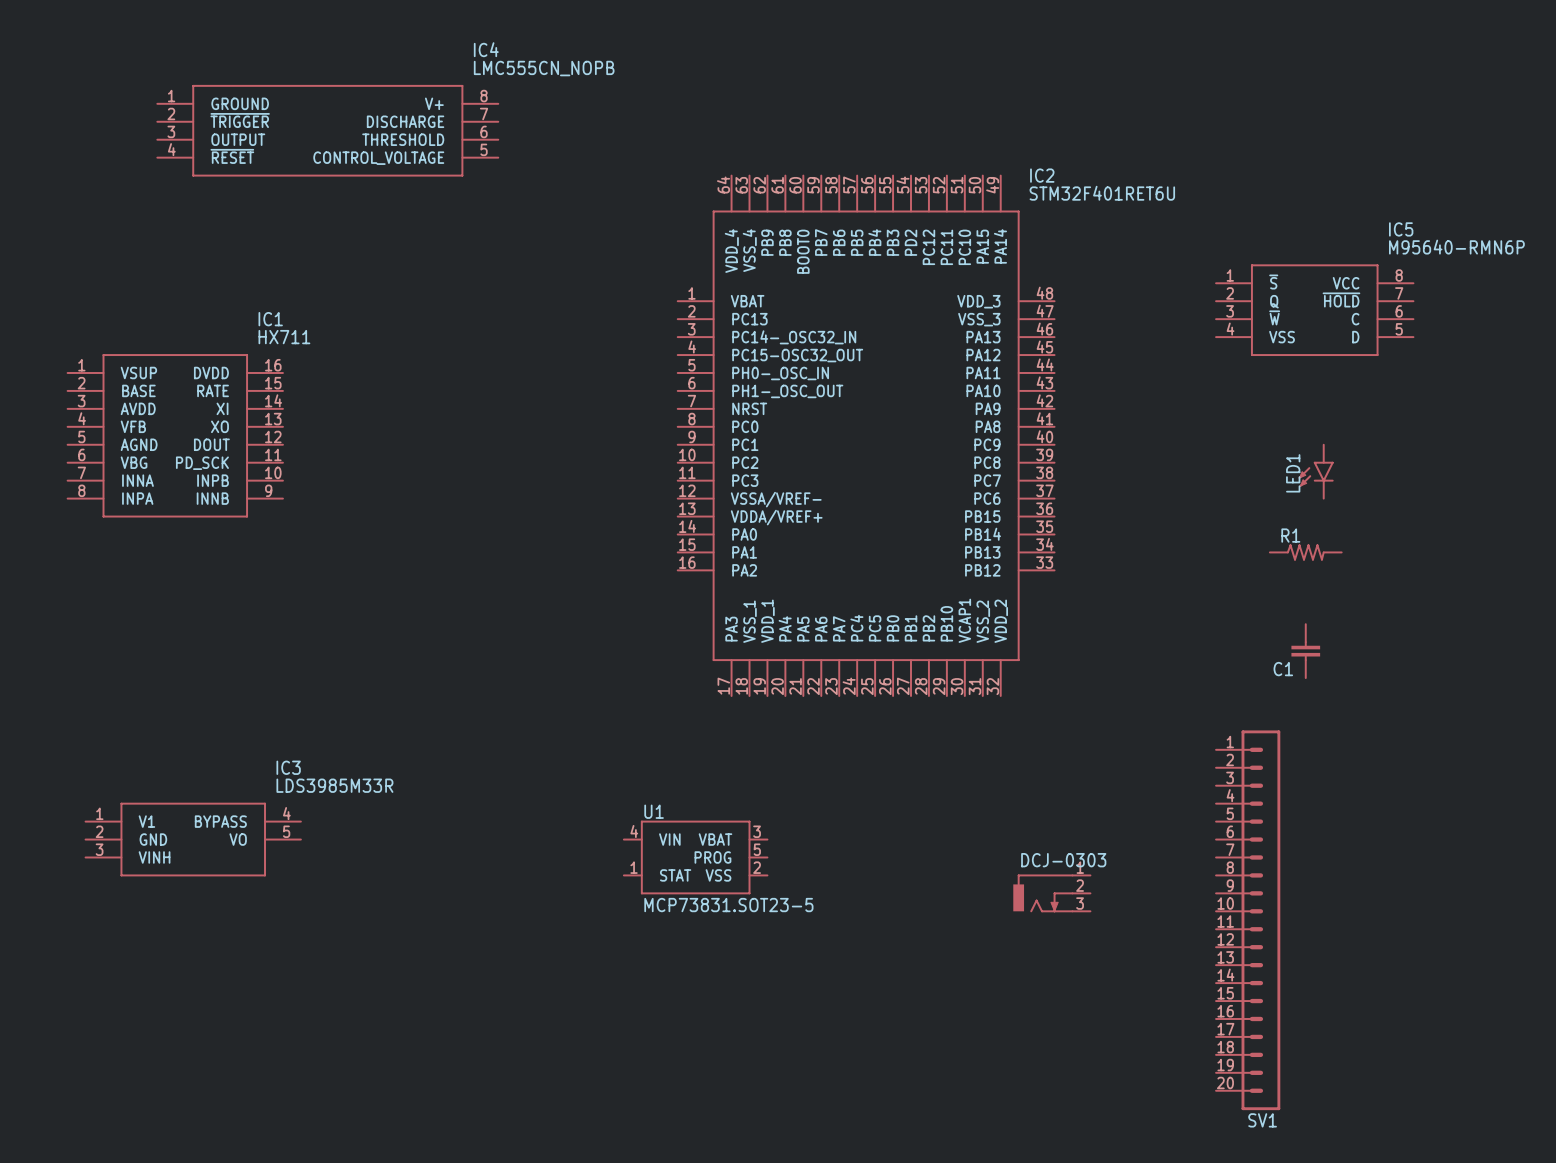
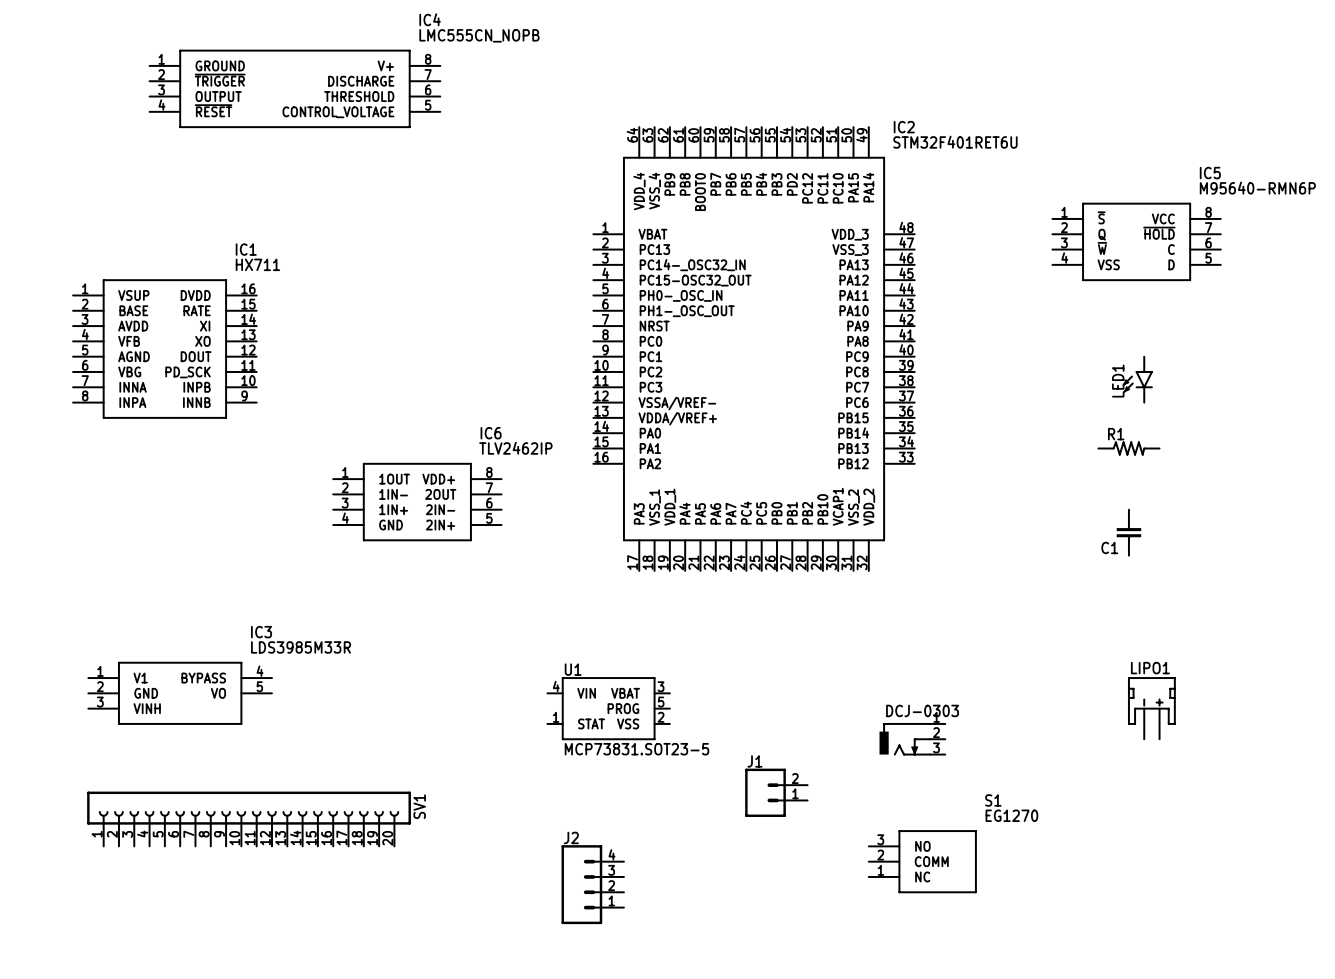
IC6: none -> TLV2462IP (417, 502)
SV1 symbol: [1216, 730, 1281, 1111] -> [87, 791, 411, 847]
LIPO1: none -> (1151, 708)
J1: none -> (776, 792)
S1: none -> EG1270 (922, 861)
J2: none -> (592, 884)
SV1 name position: SV1 (1262, 1120) -> SV1 (419, 806)

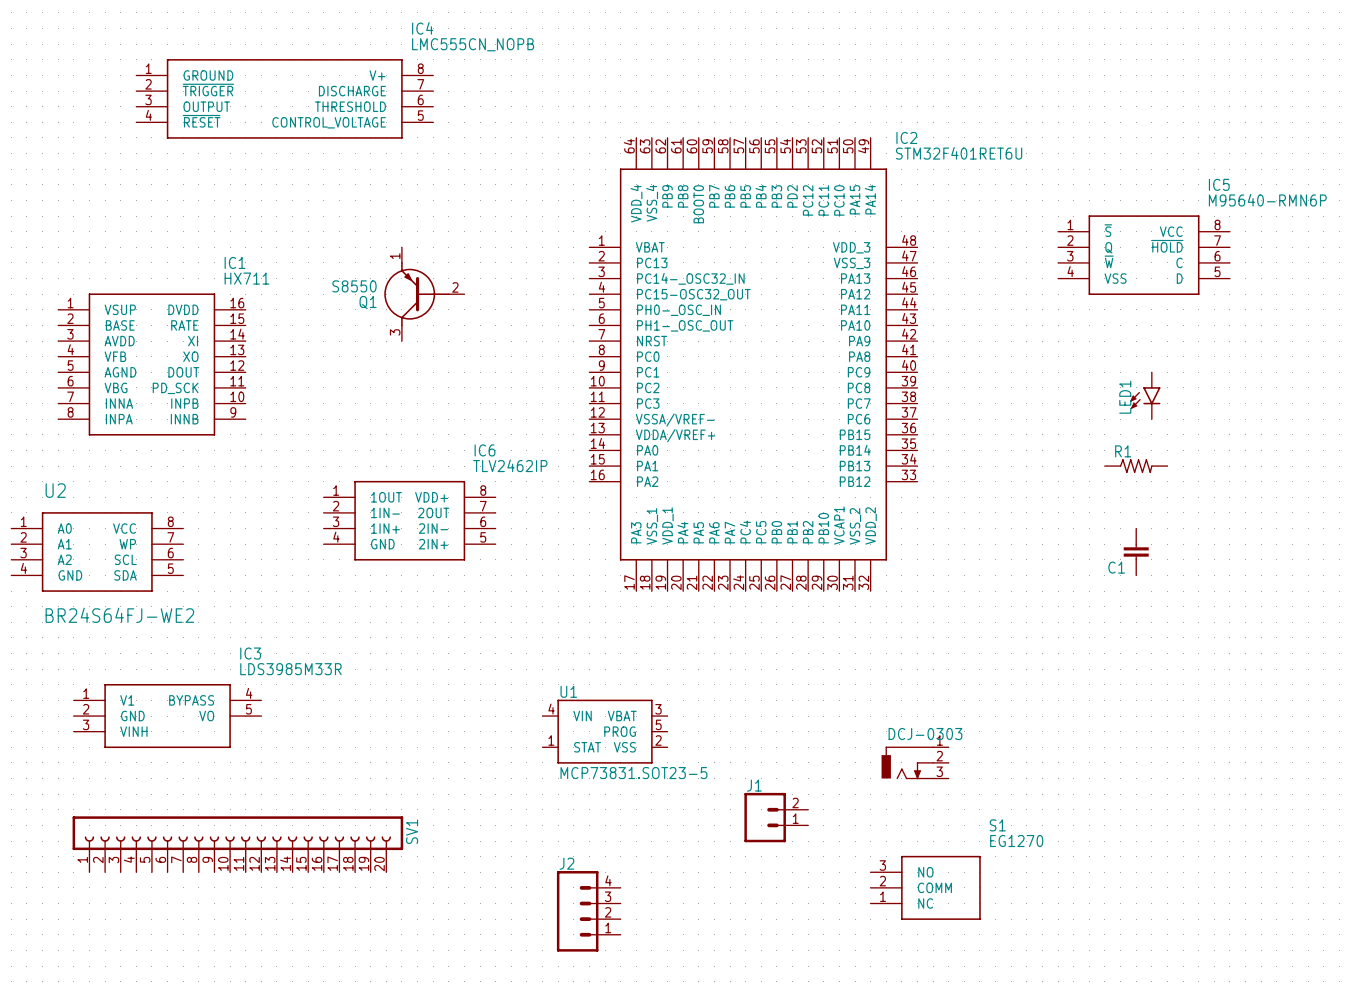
Q1: none -> S8550 (424, 294)
U2: none -> BR24S64FJ-WE2 (97, 551)
LIPO1: (1151, 708) -> none

